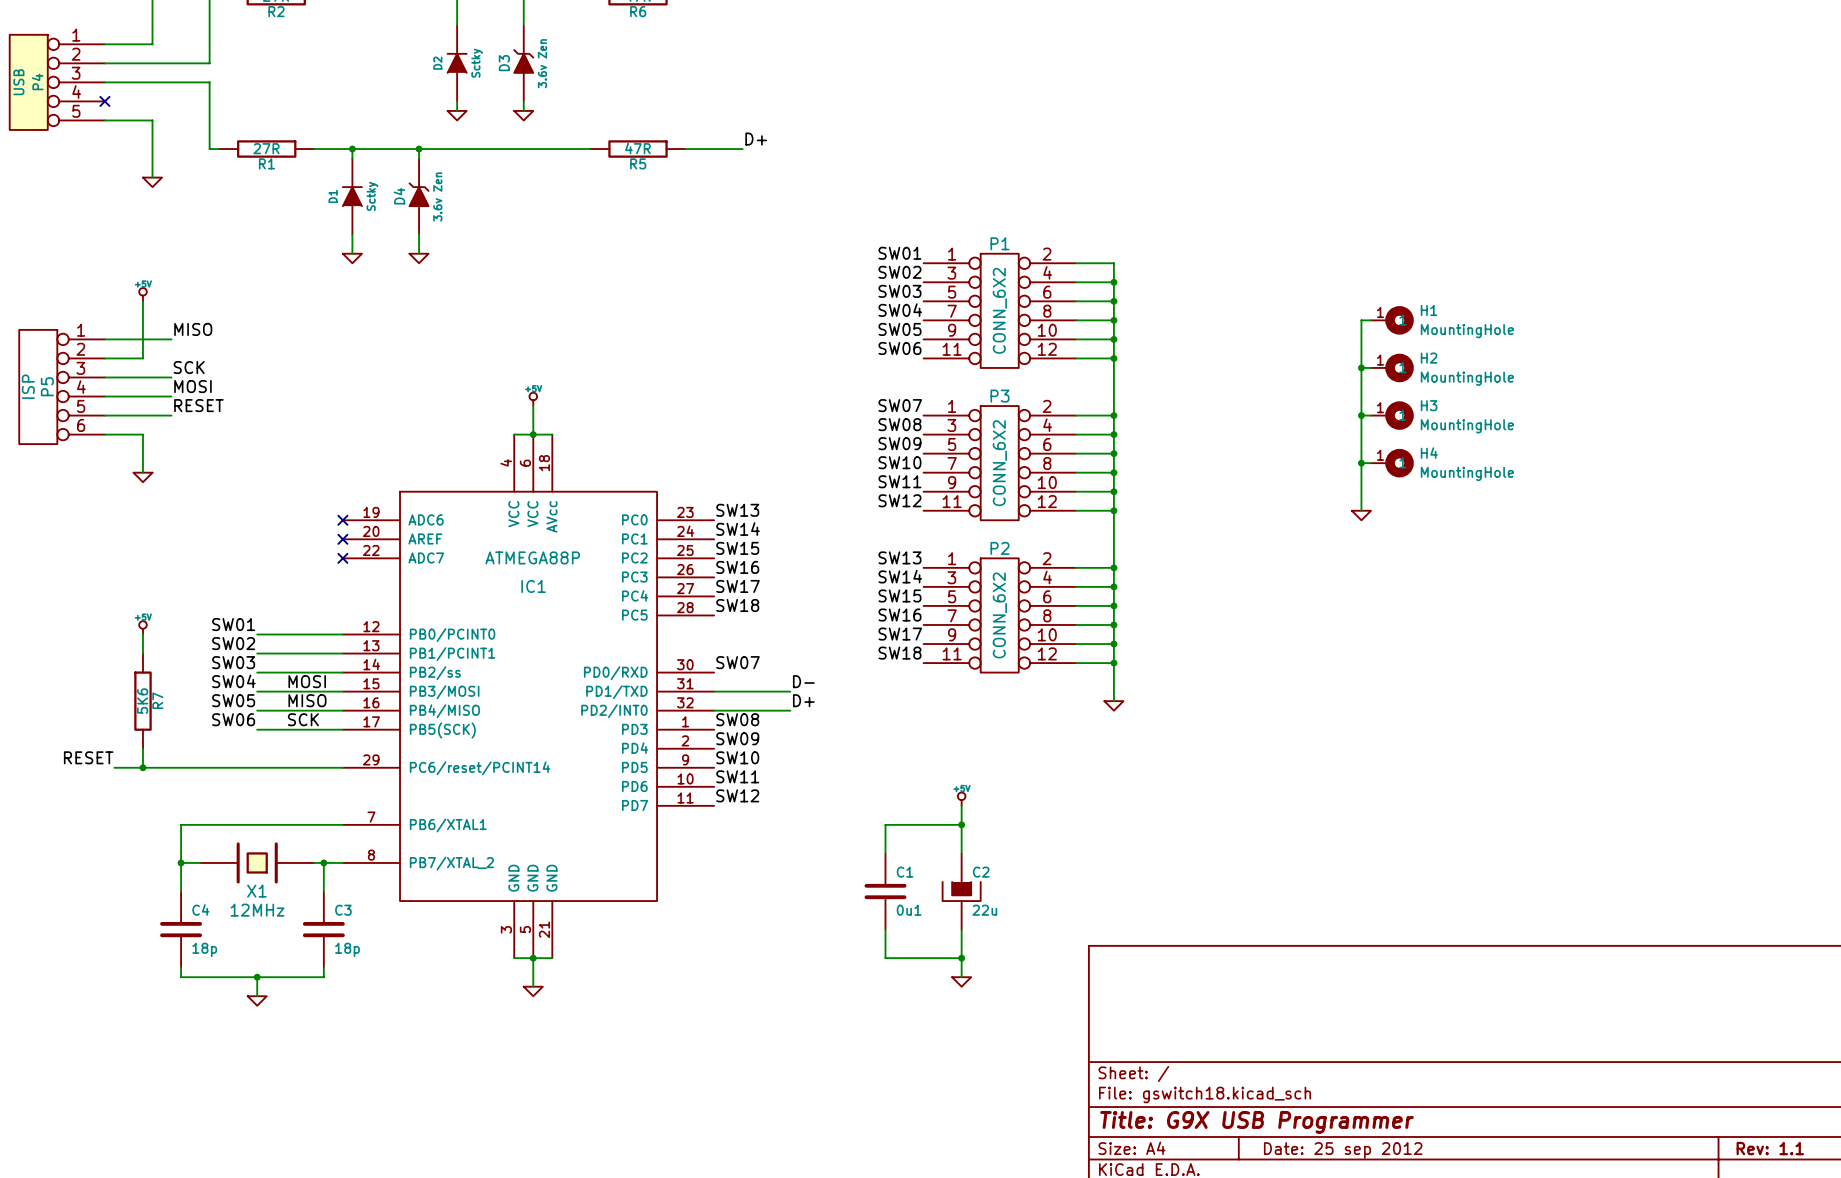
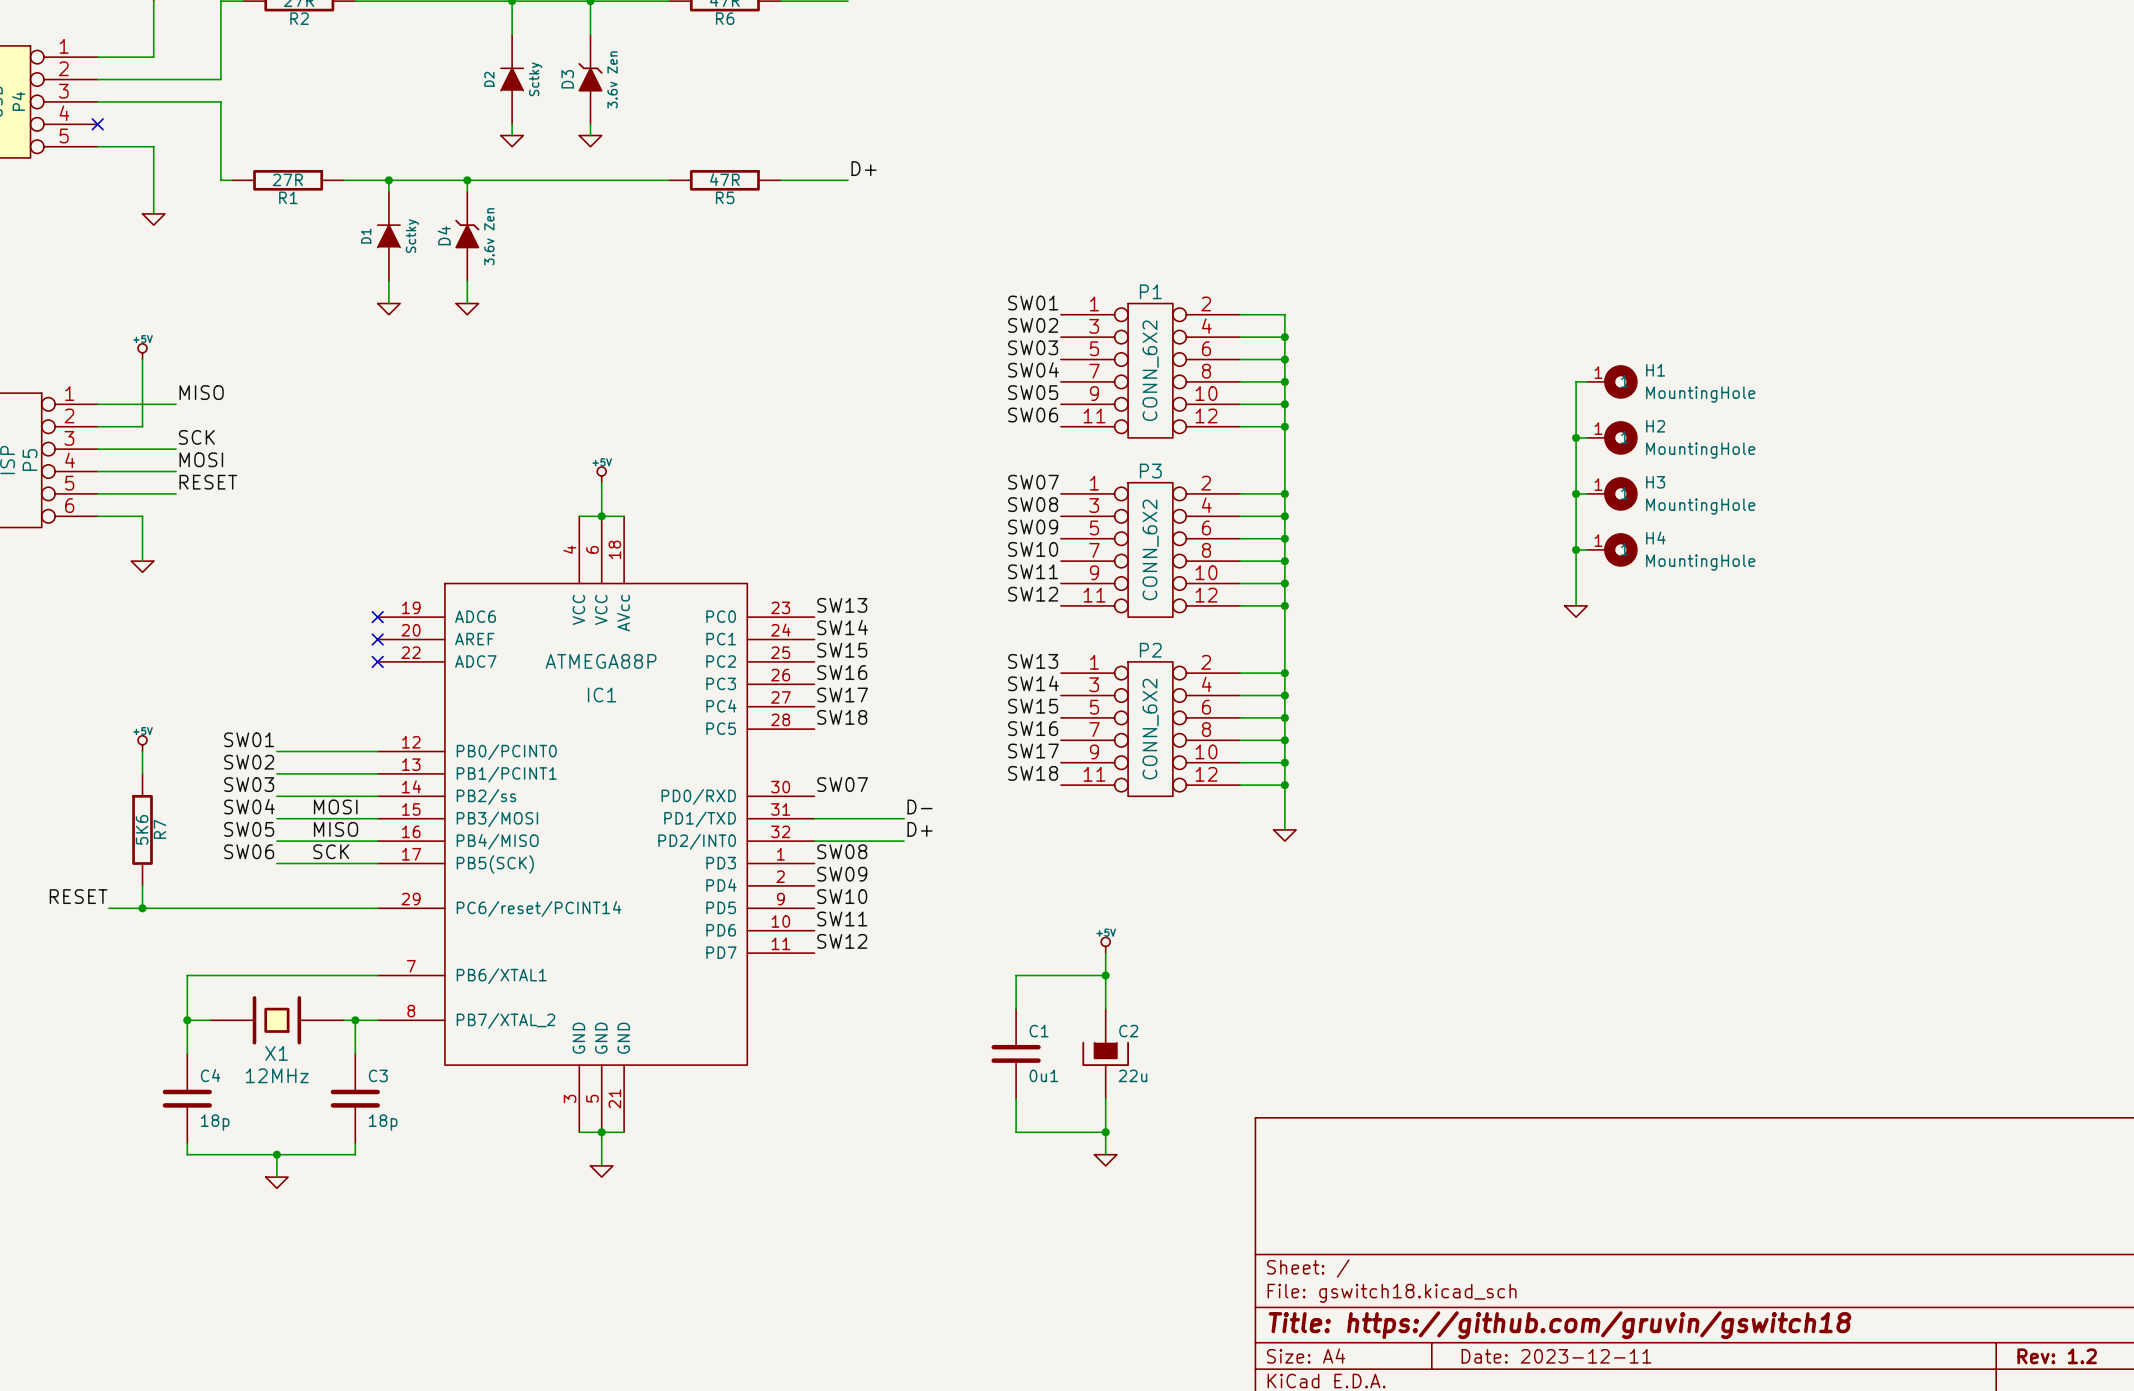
title block: Title: G9X USB Programmer (1256, 1122) -> Title: https://github.com/gruvin/gswitch18 (1559, 1325)
title block: Rev: 1.1 (1770, 1148) -> Rev: 1.2 (2057, 1356)
title block: Date: 25 sep 2012 (1343, 1150) -> Date: 2023-12-11 (1556, 1356)

